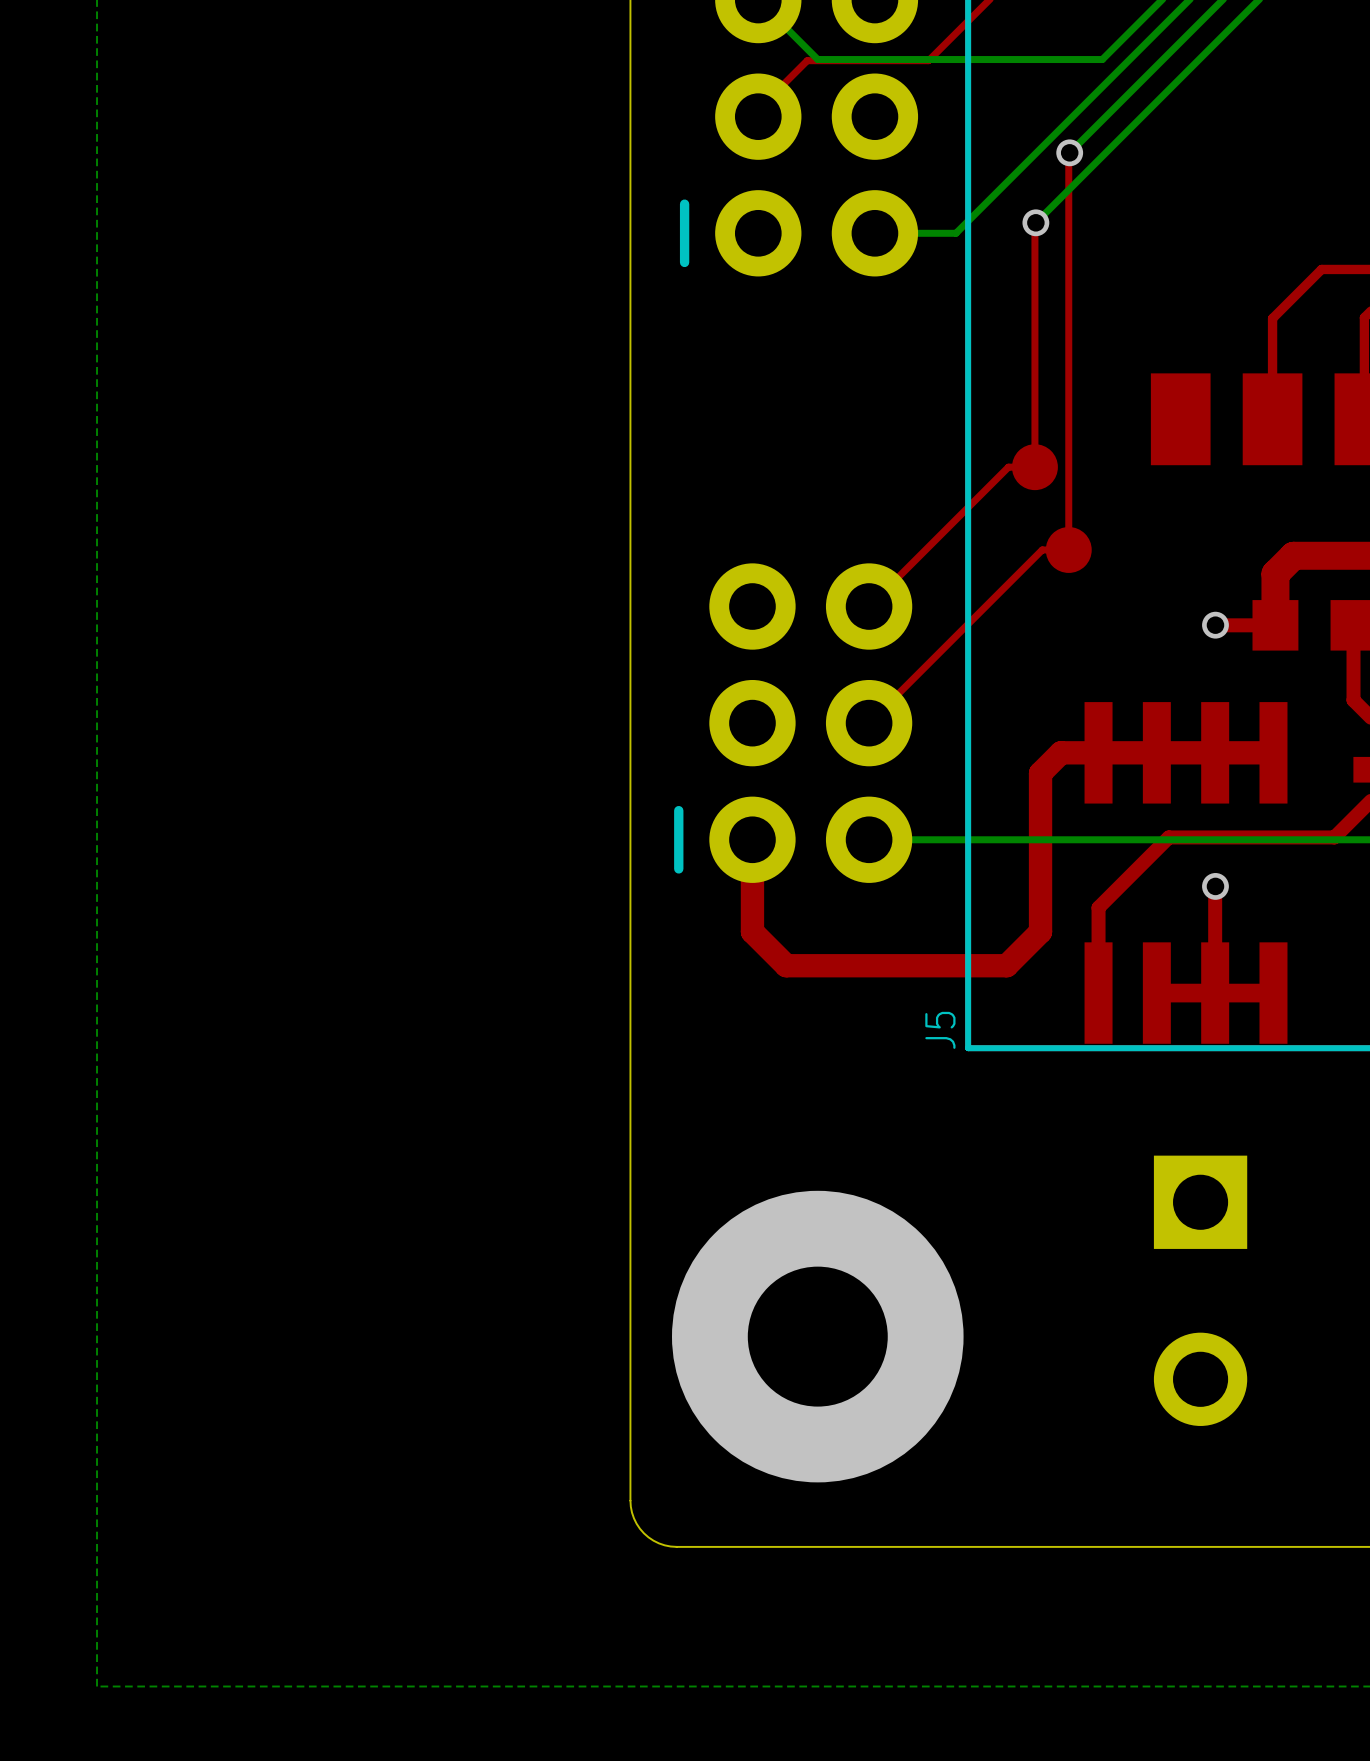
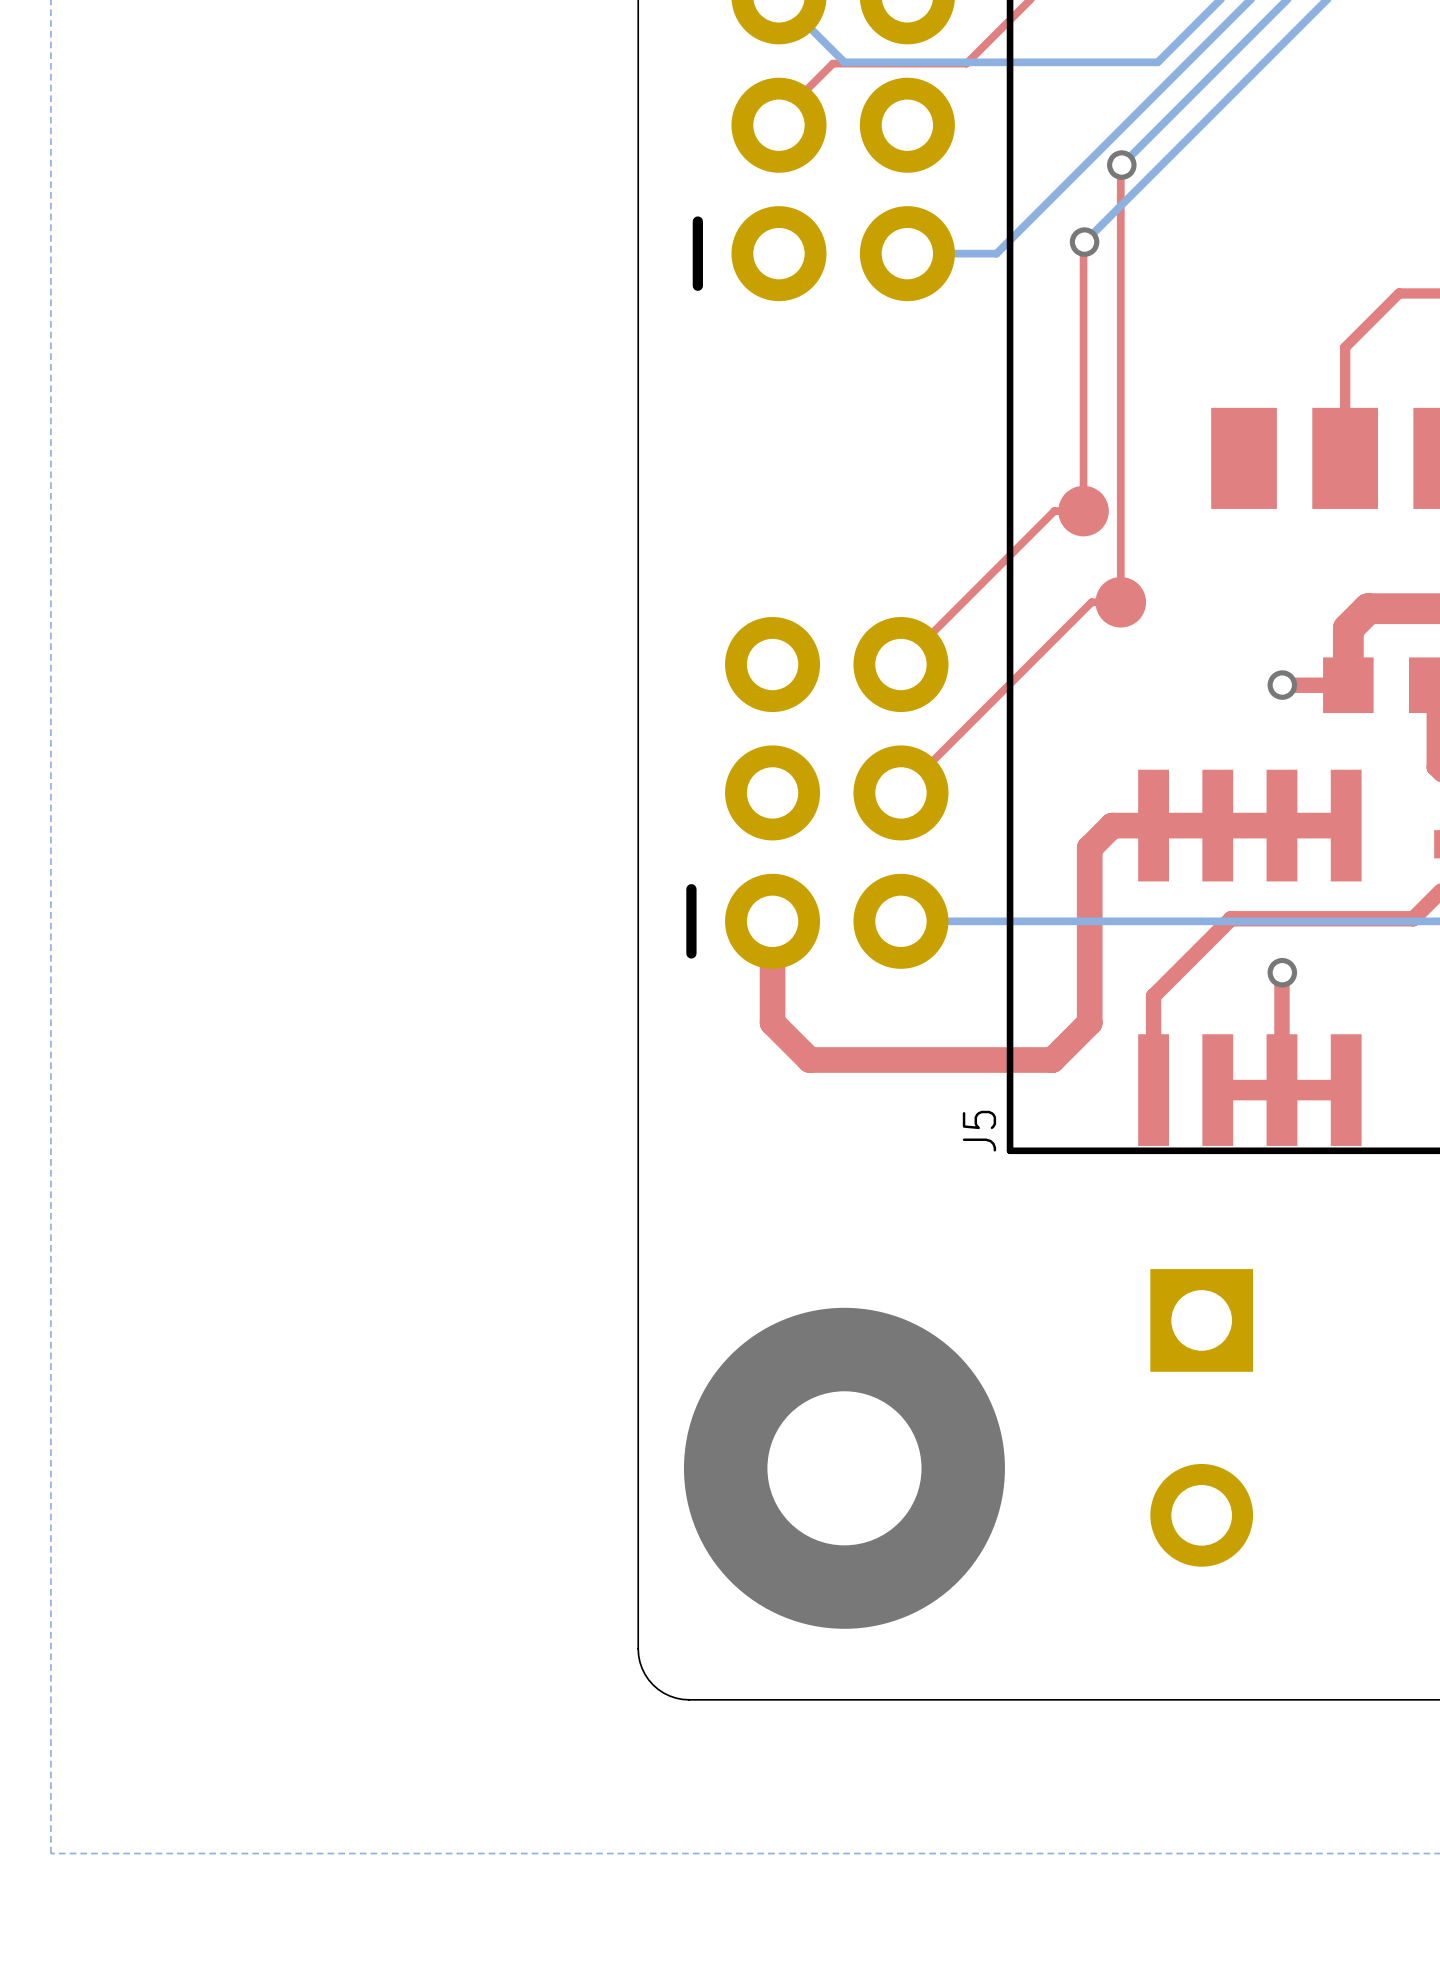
part position: (1200, 1290) -> (1201, 1417)

